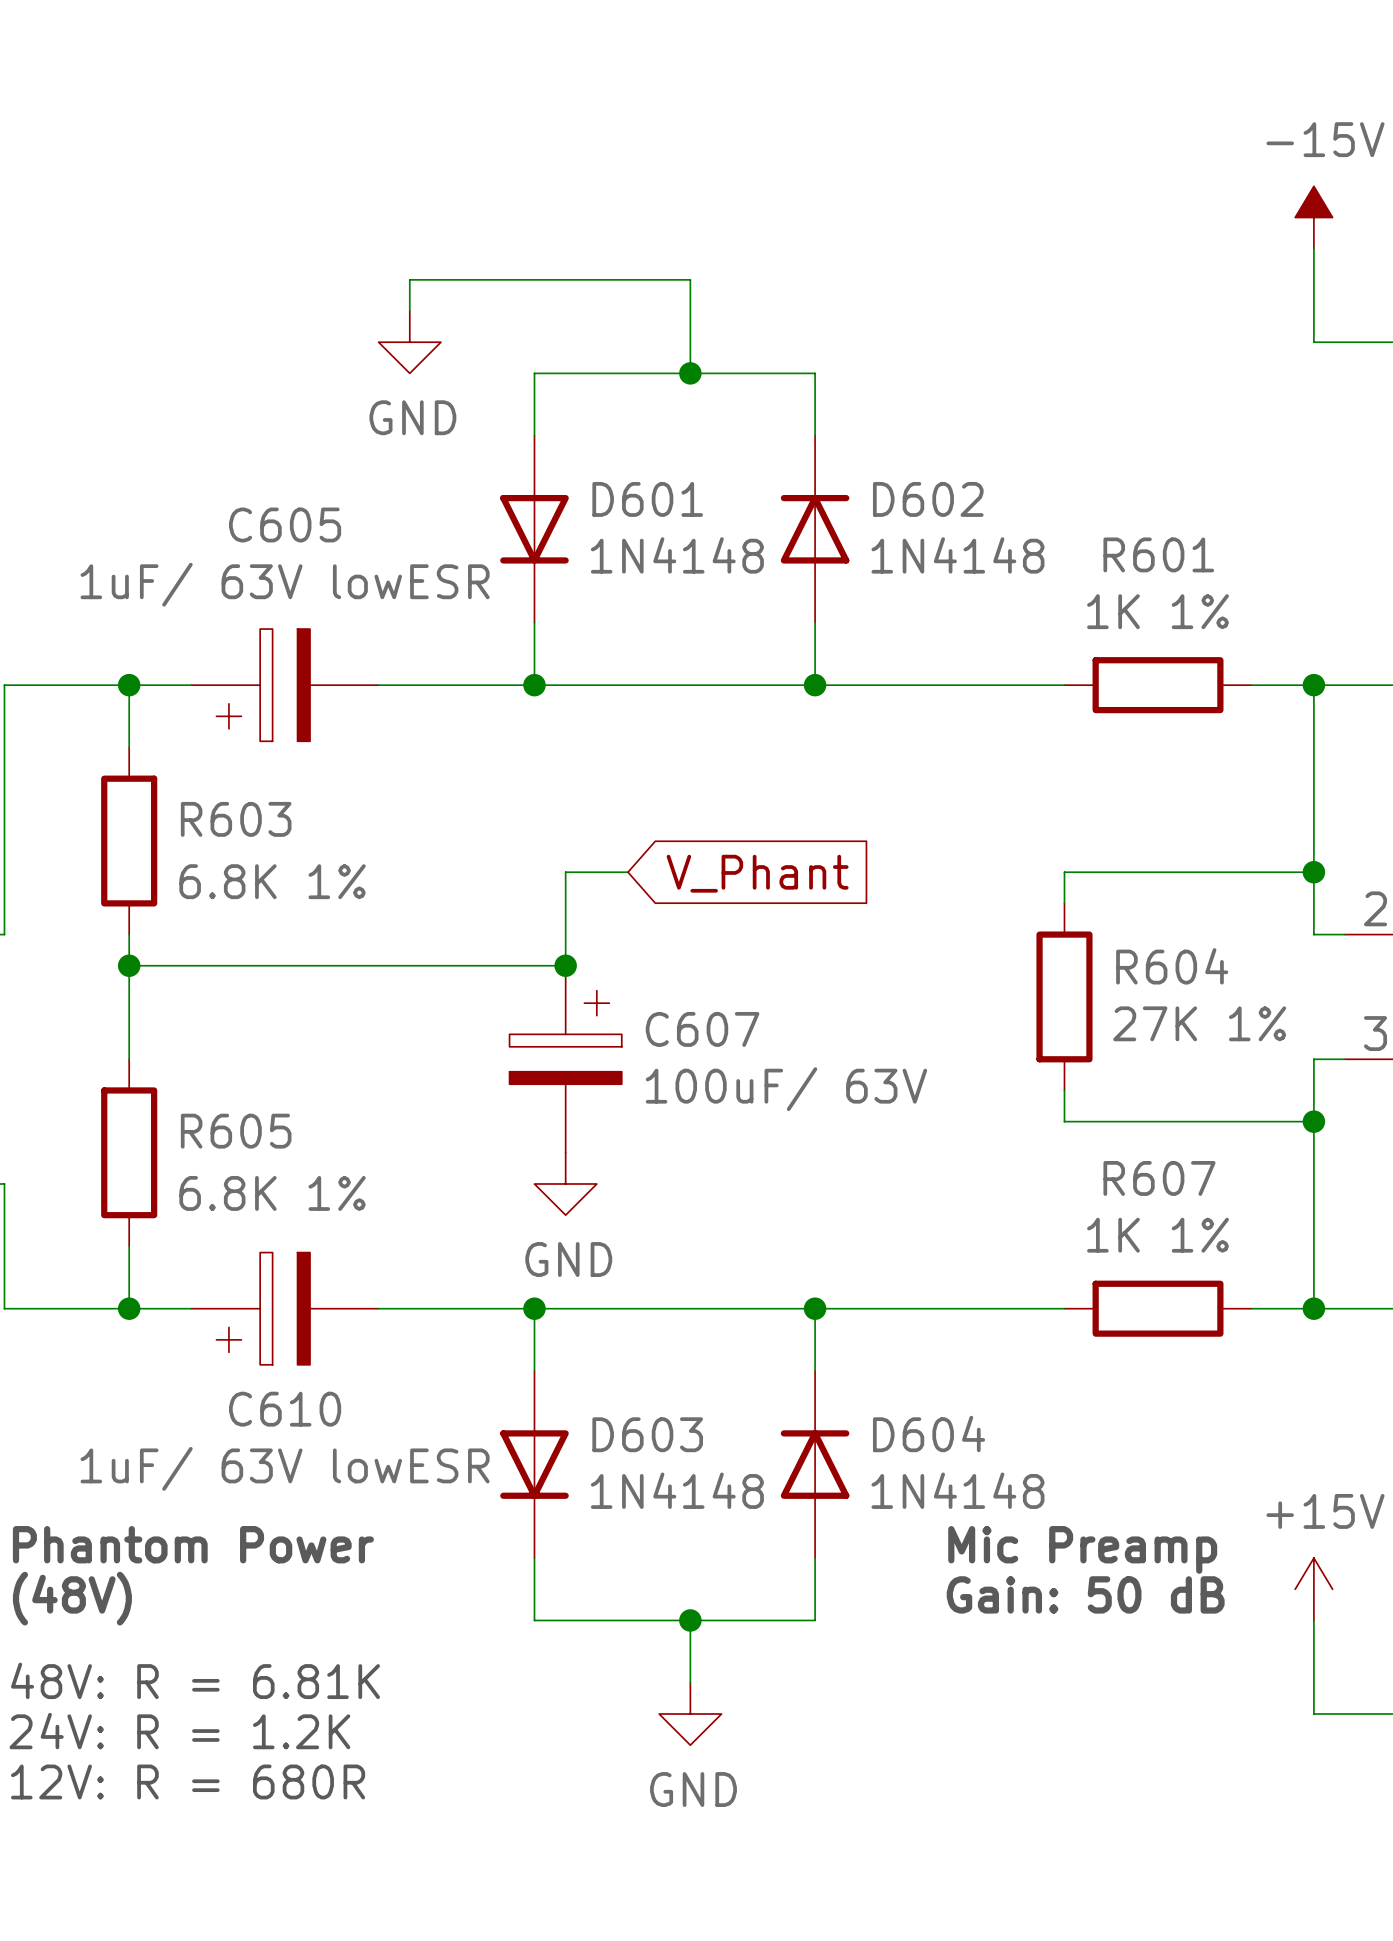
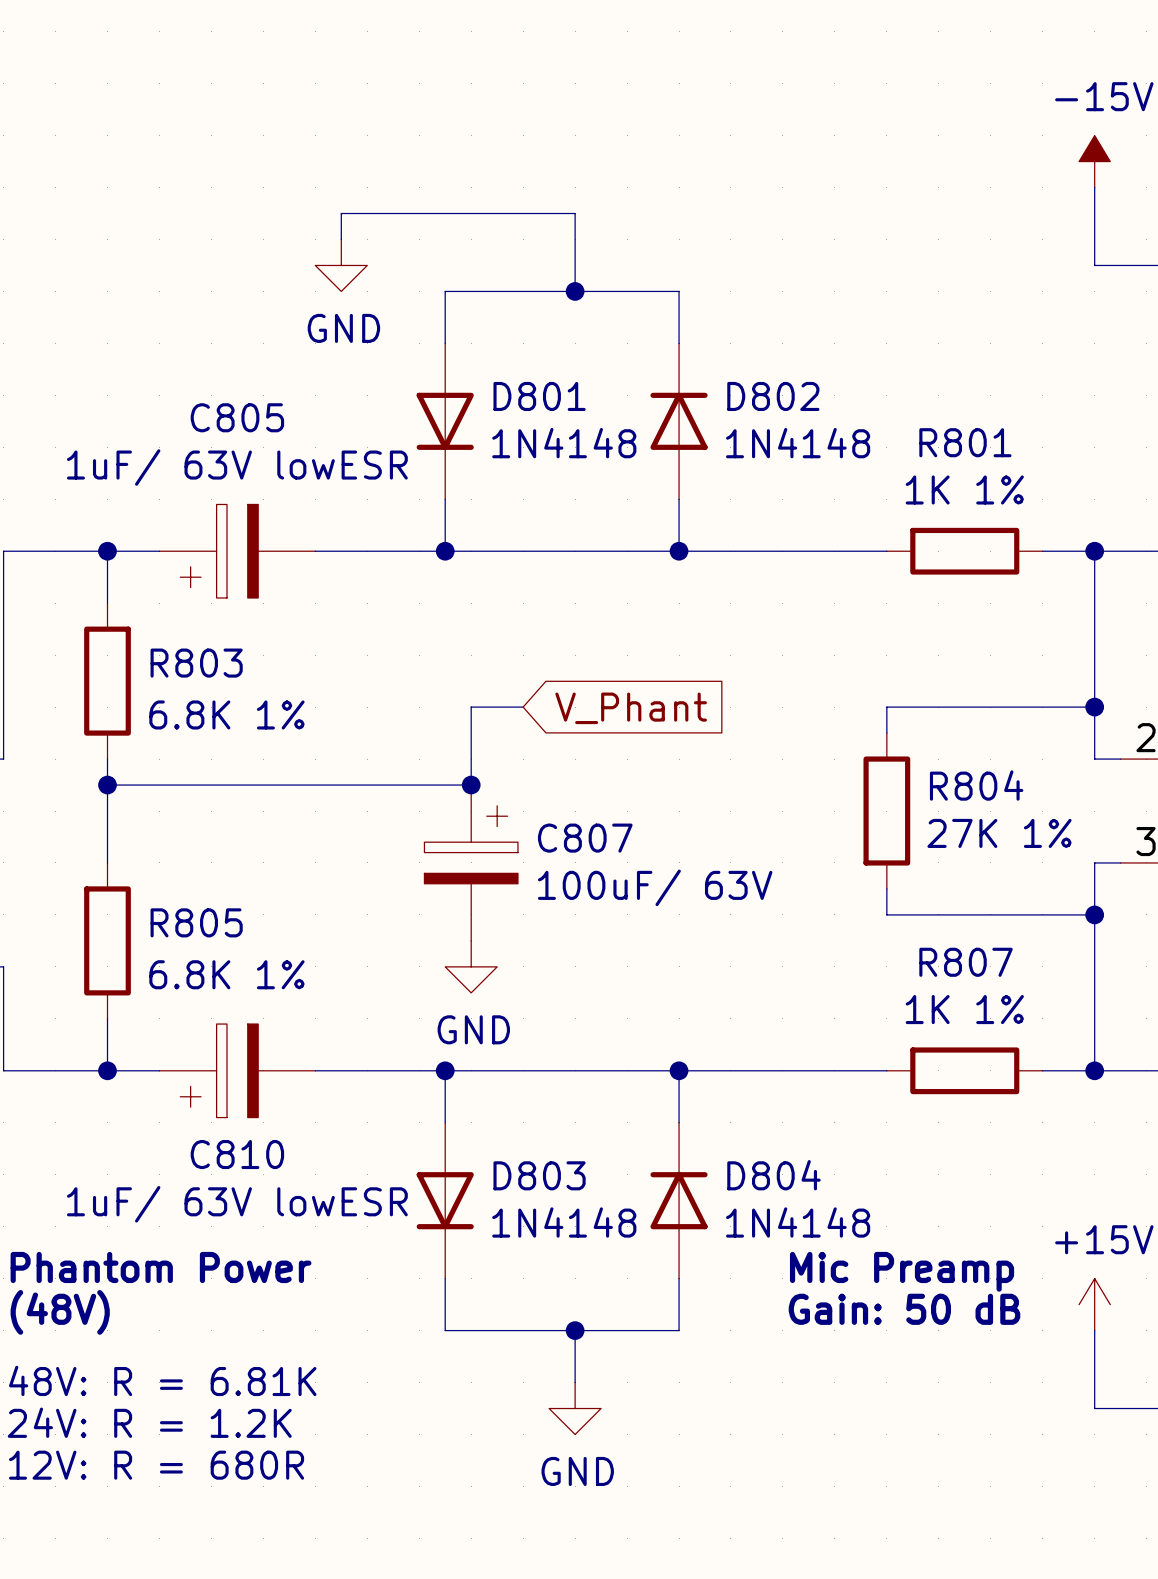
D601 name: D601 (647, 499) -> D801 (539, 396)
D602 name: D602 (928, 499) -> D802 (773, 396)
C605 name: C605 (285, 524) -> C805 (237, 417)
R601 name: R601 (1158, 554) -> R801 (965, 442)
R603 name: R603 (236, 819) -> R803 (196, 663)
R604 name: R604 (1172, 966) -> R804 (976, 785)
C607 name: C607 (702, 1029) -> C807 (585, 838)
R605 name: R605 (236, 1131) -> R805 (196, 922)
R607 name: R607 (1159, 1178) -> R807 (966, 962)
C610 name: C610 (285, 1409) -> C810 (237, 1154)
D604 name: D604 (929, 1433) -> D804 (773, 1175)
D603 name: D603 (647, 1434) -> D803 (539, 1175)

